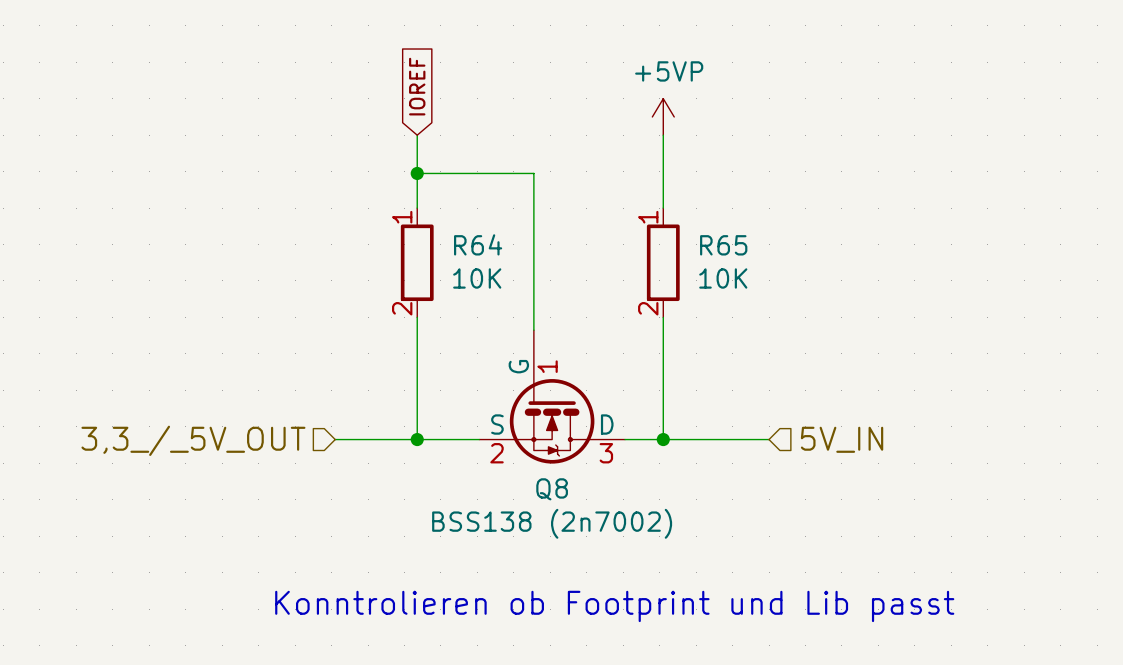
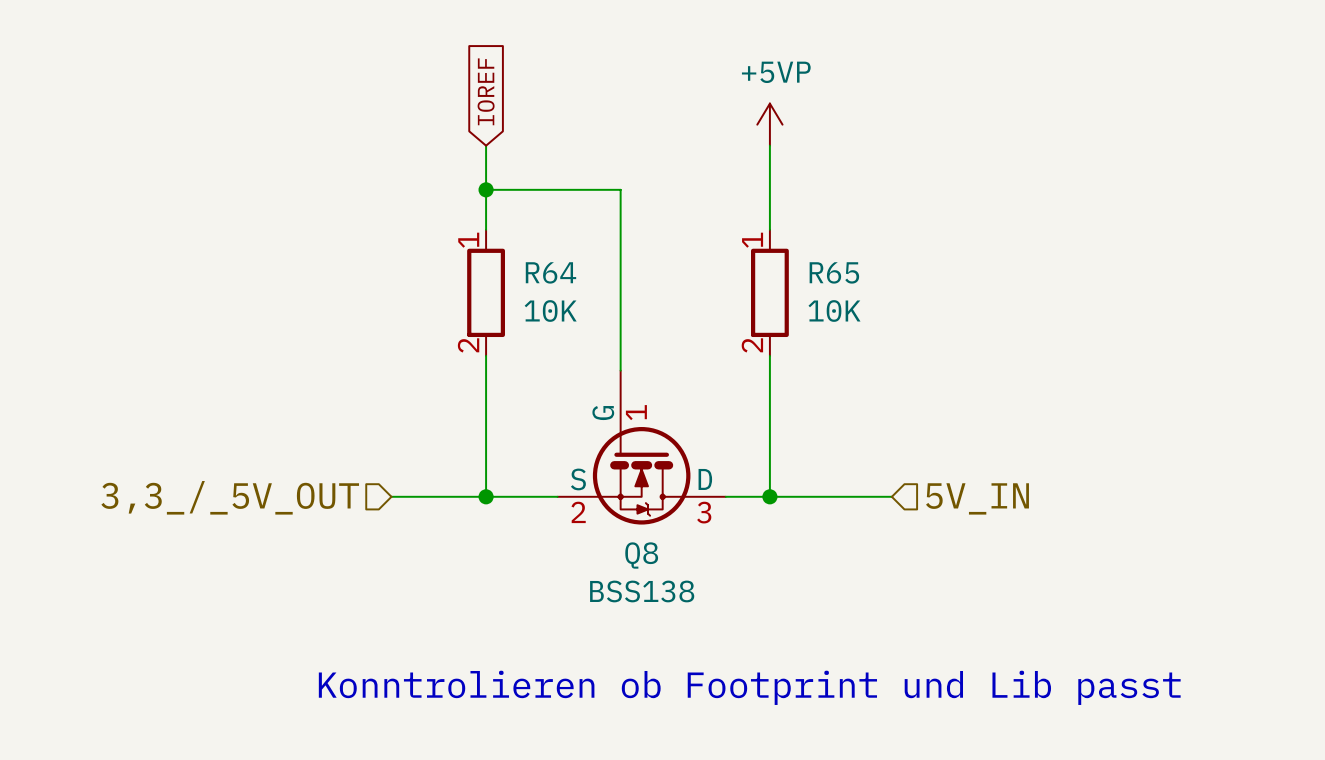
Q8 value: BSS138 (2n7002) (552, 523) -> BSS138 (642, 591)

